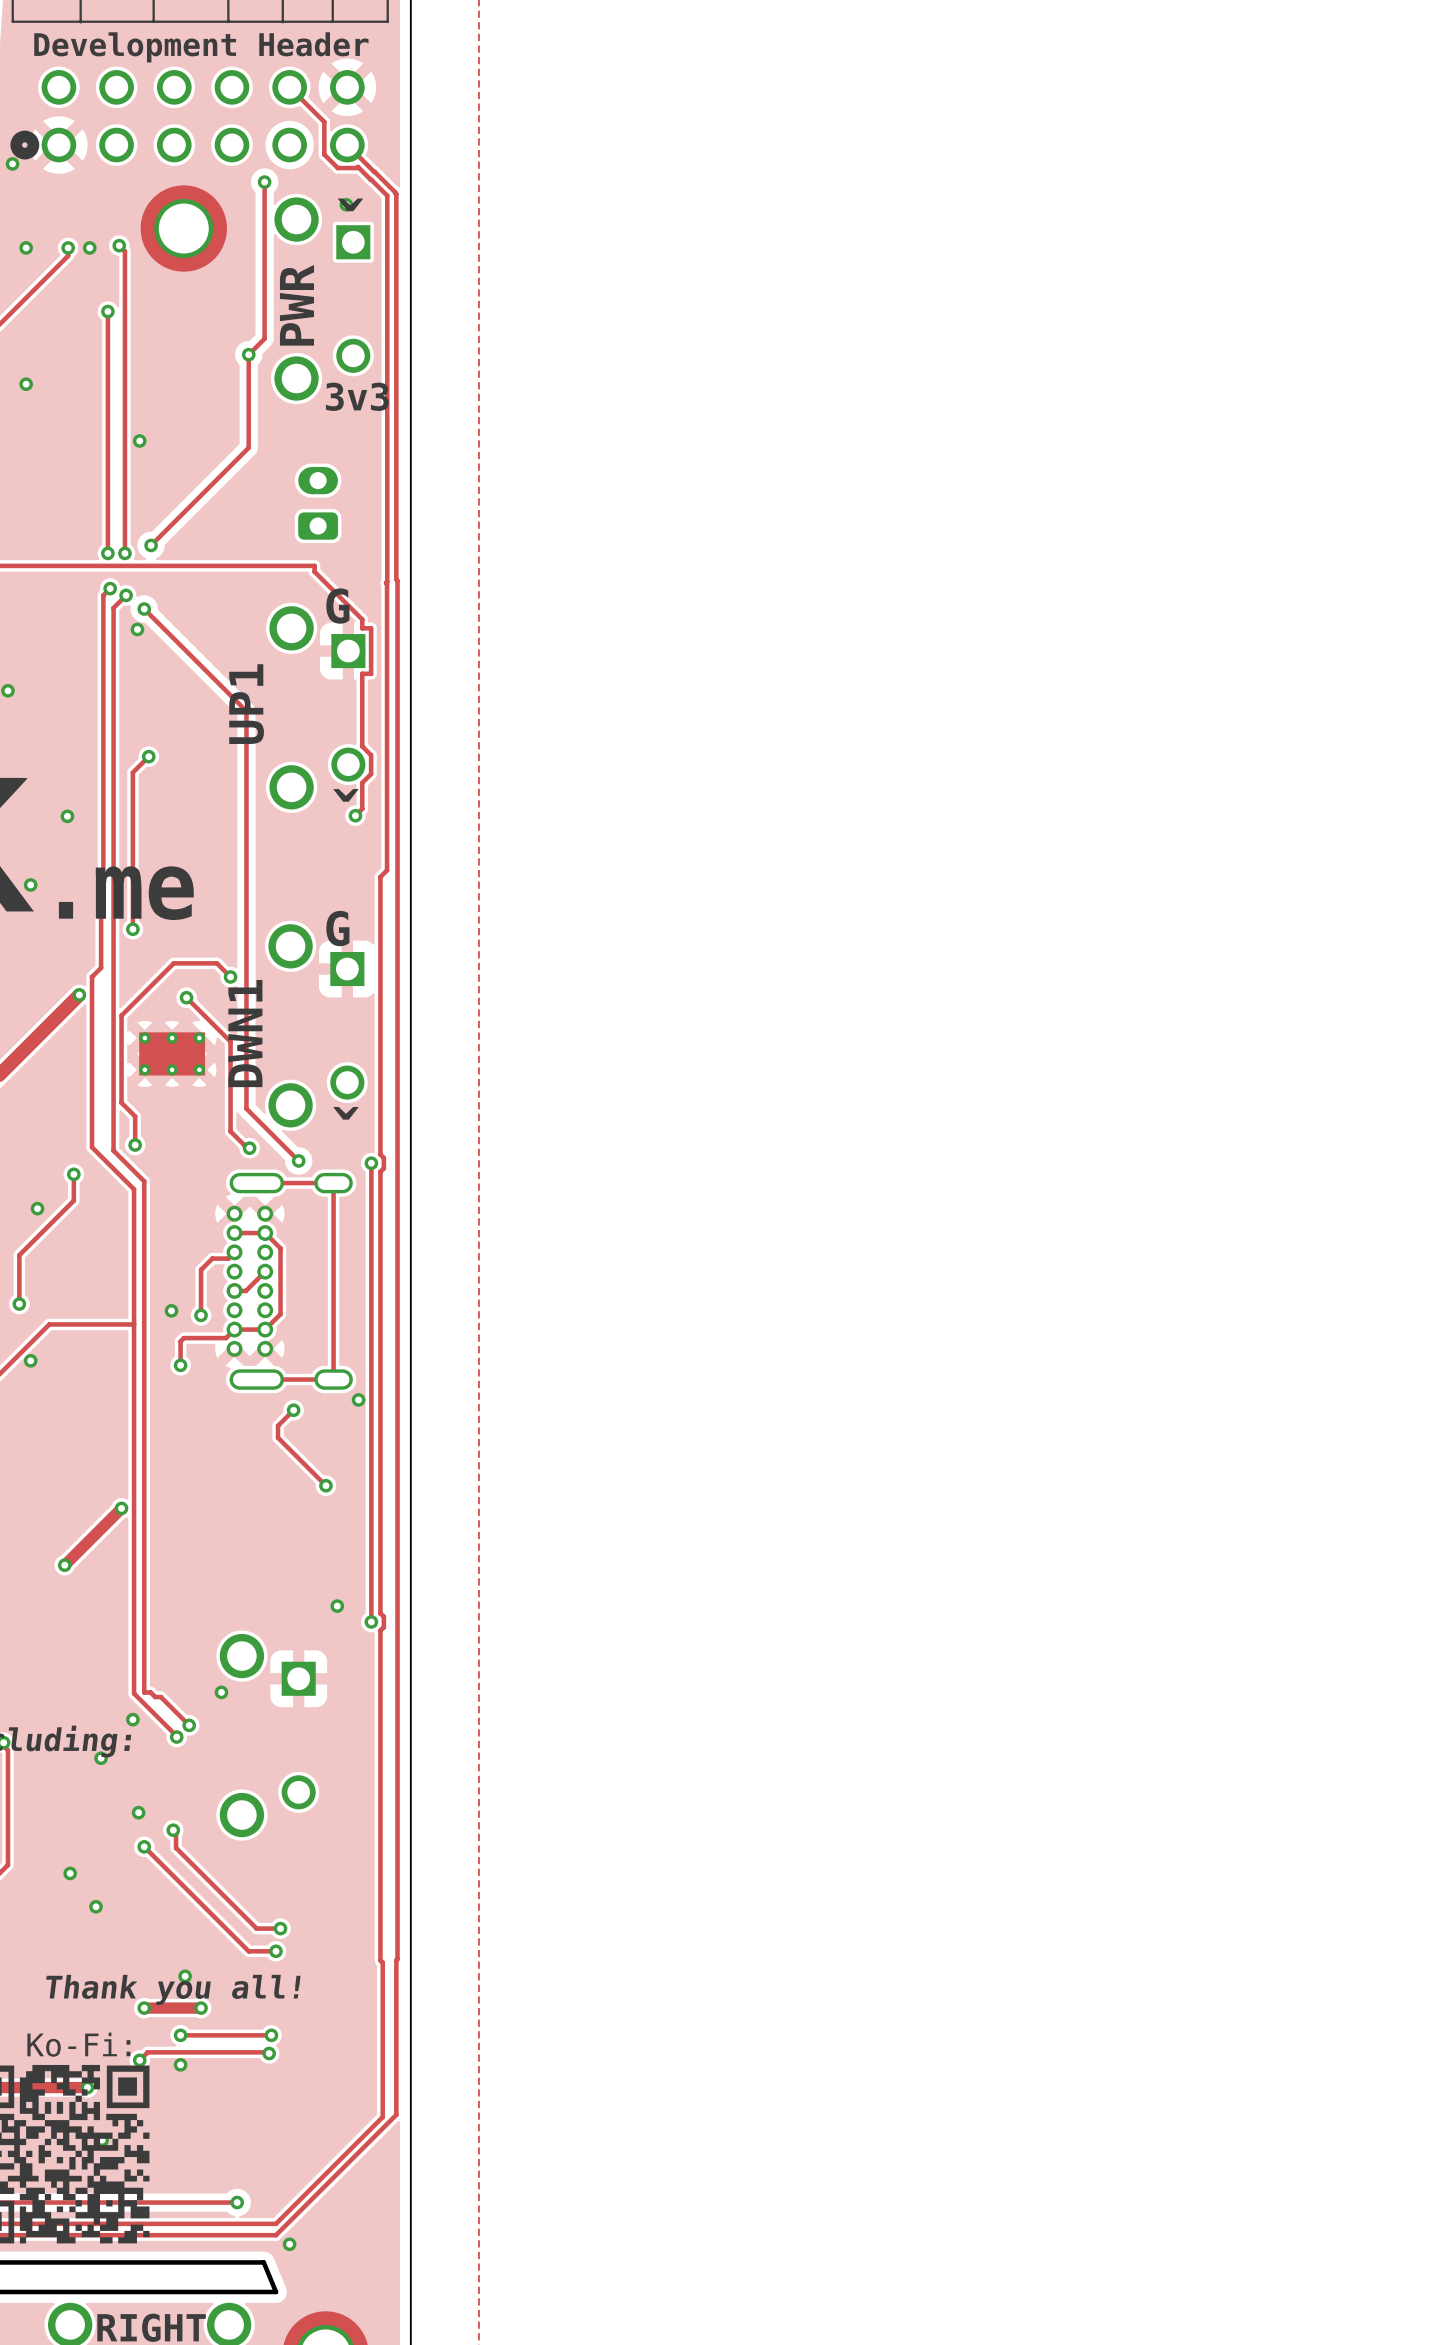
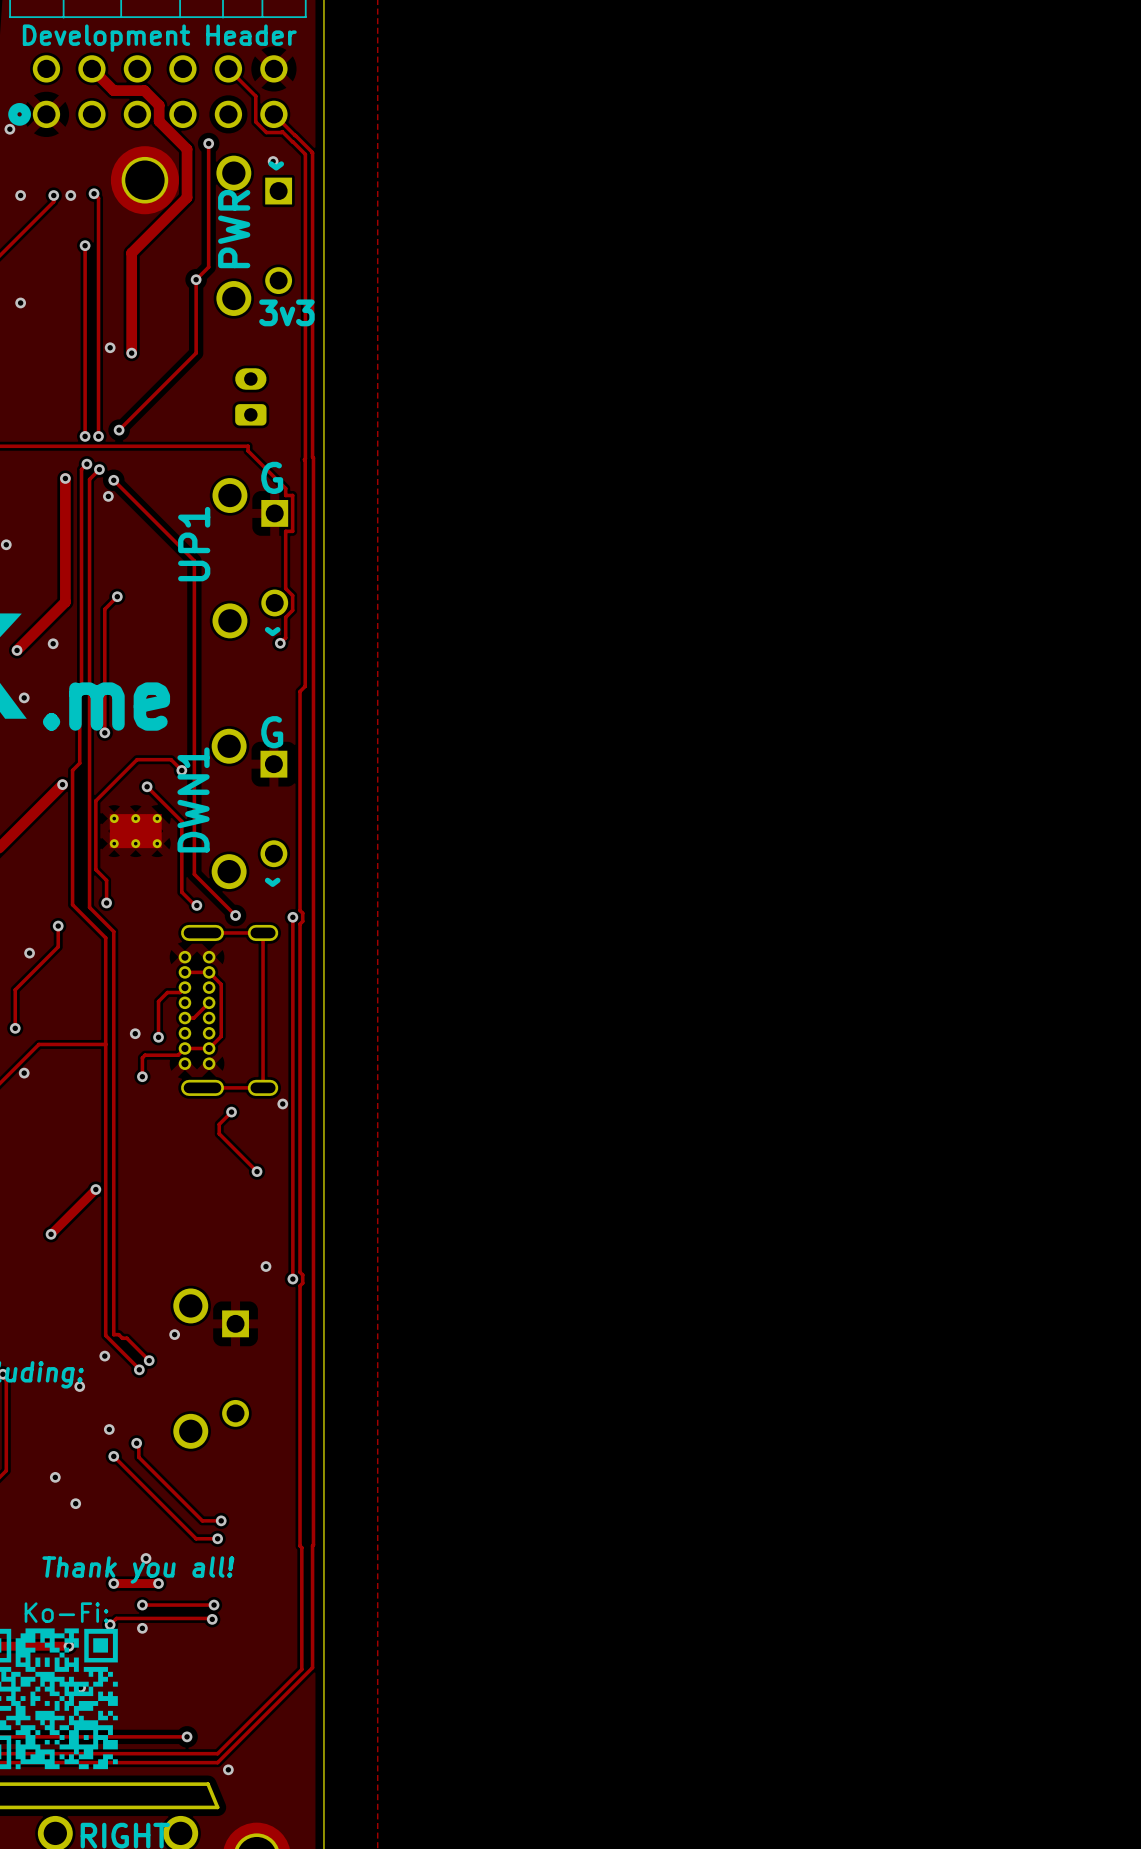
track: none -> (91, 68) (113, 90) (144, 90) (159, 105) (159, 121) (187, 149) (187, 197) (131, 253) (131, 353)
via: none -> (131, 353)
track: none -> (65, 478) (65, 602) (17, 650)
via: none -> (65, 478)
via: none -> (17, 650)

